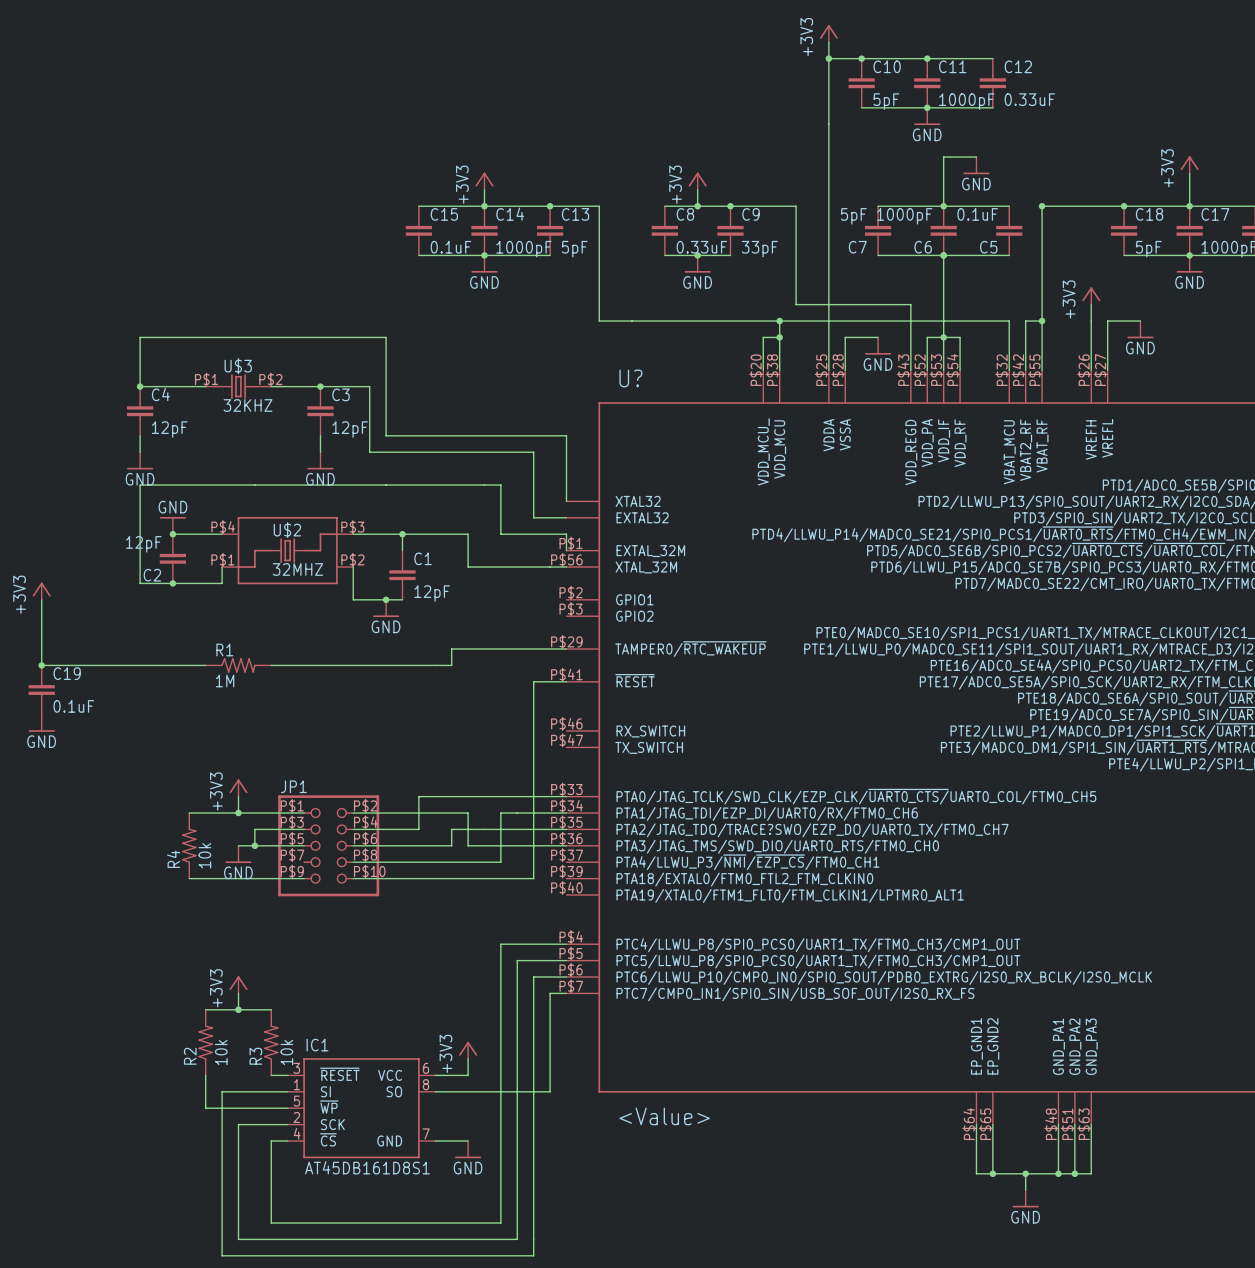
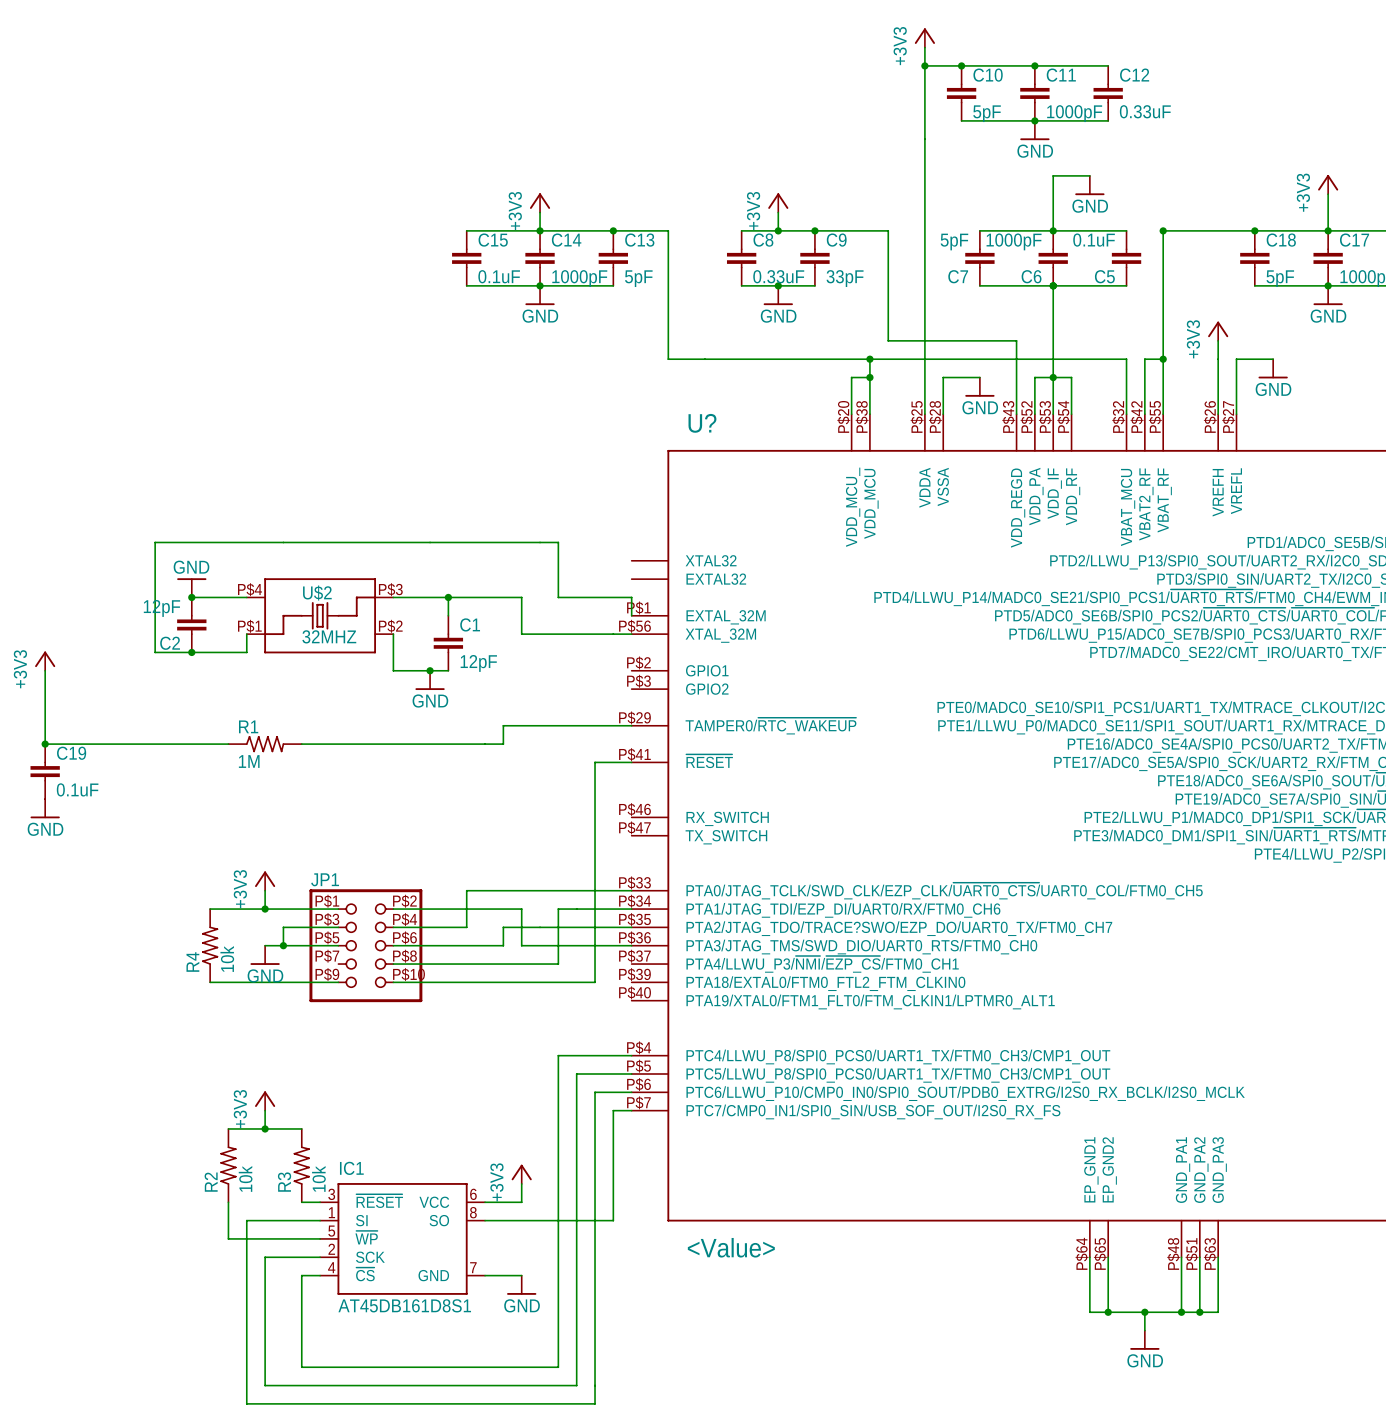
junction: (140, 386) -> none
wire: (205, 386) (140, 386) (140, 337) (386, 337) (386, 435) (566, 435) (566, 501) -> none
U$3: 32KHZ (238, 386) -> none
wire: (271, 386) (369, 386) (369, 452) (533, 452) (533, 517) (566, 517) -> none
junction: (320, 386) -> none
C4: 12pF (140, 411) -> none
C3: 12pF (320, 411) -> none
wire: (140, 435) (140, 452) -> none
wire: (320, 435) (320, 452) -> none
power symbol: GND (140, 460) -> none
power symbol: GND (320, 460) -> none

